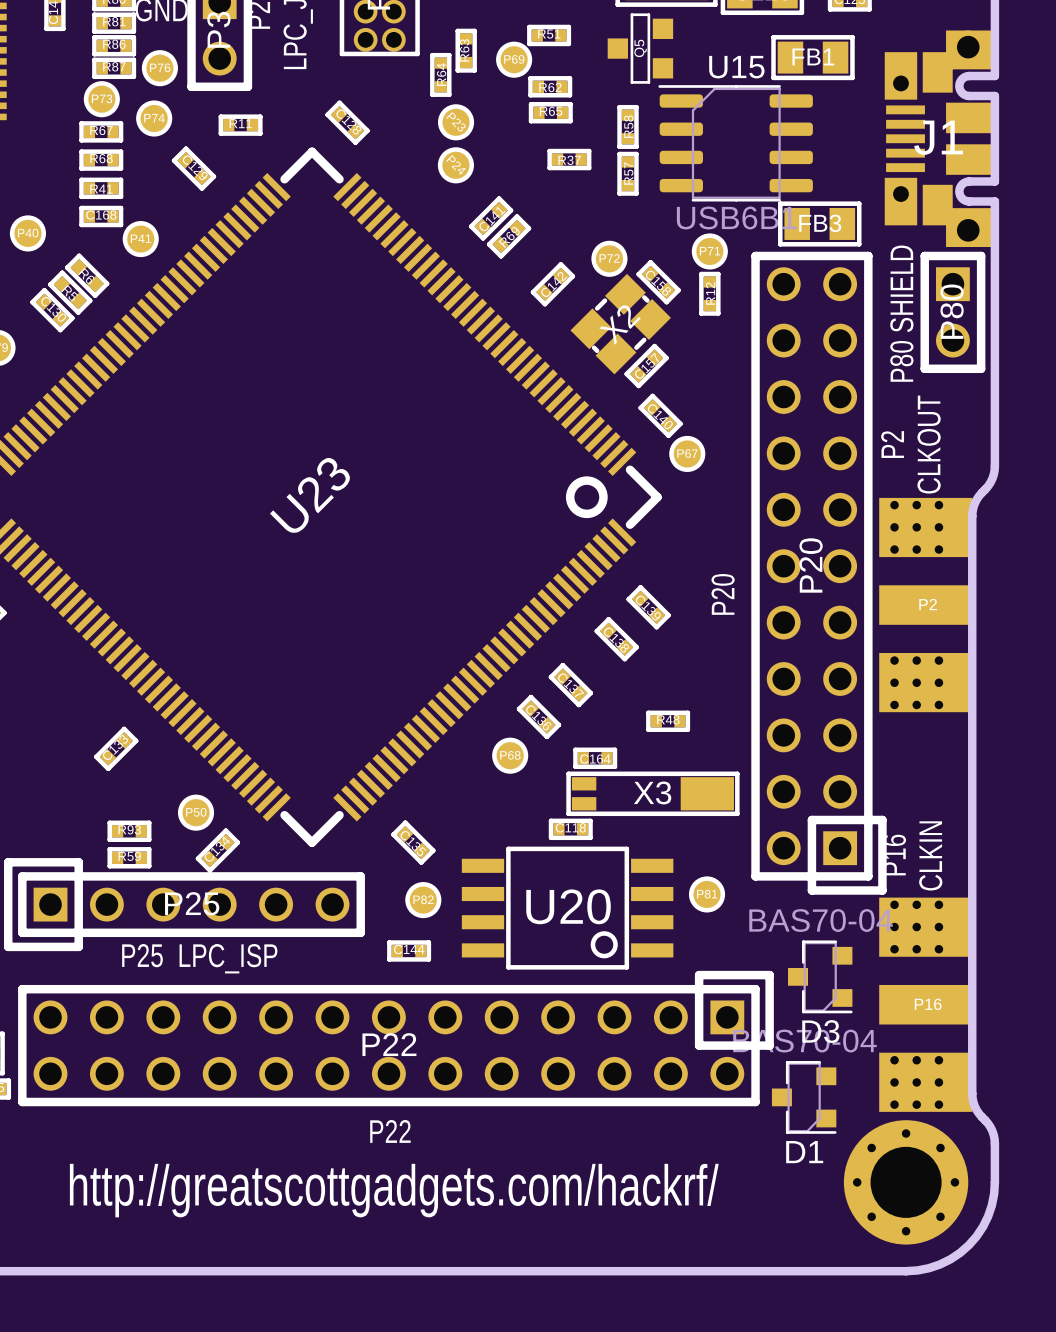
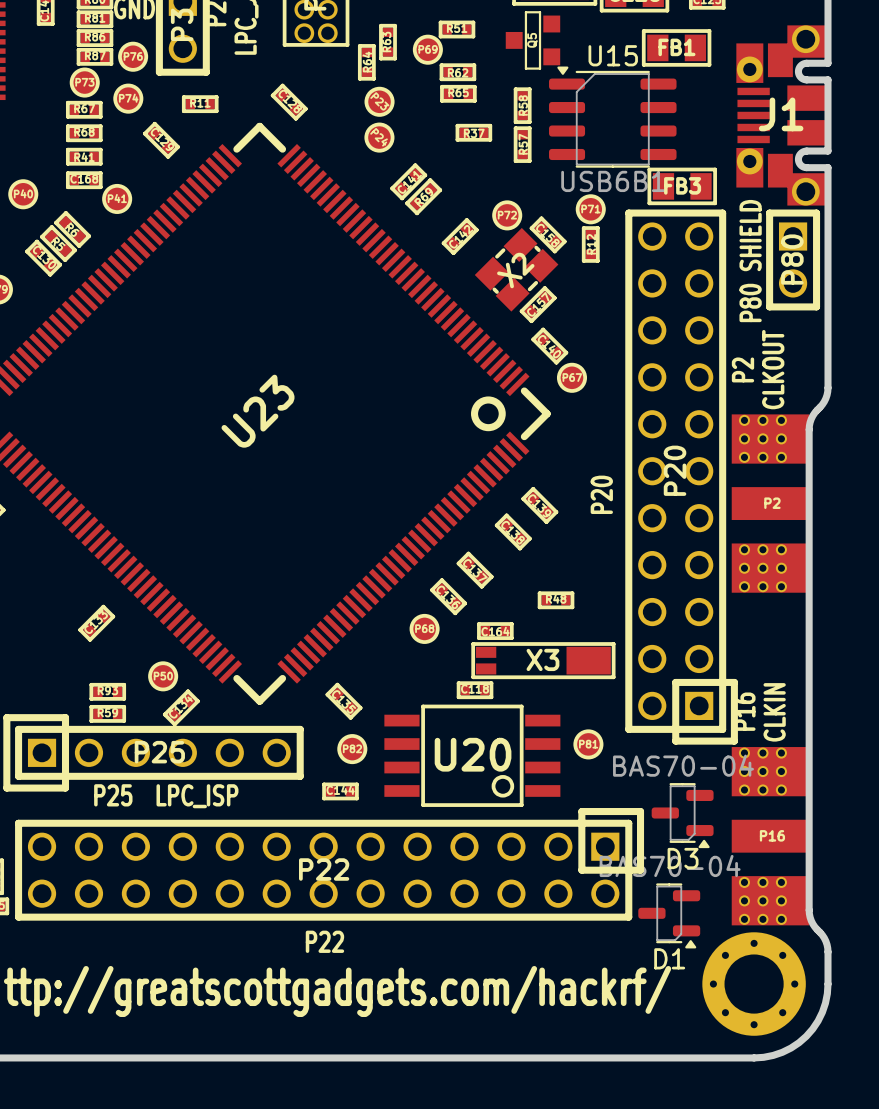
U15 footprint: [658, 85, 813, 202] -> [549, 66, 677, 168]
D3 footprint: [788, 940, 853, 1014] -> [651, 783, 714, 849]
D1 footprint: [771, 1060, 837, 1134] -> [638, 883, 701, 949]

